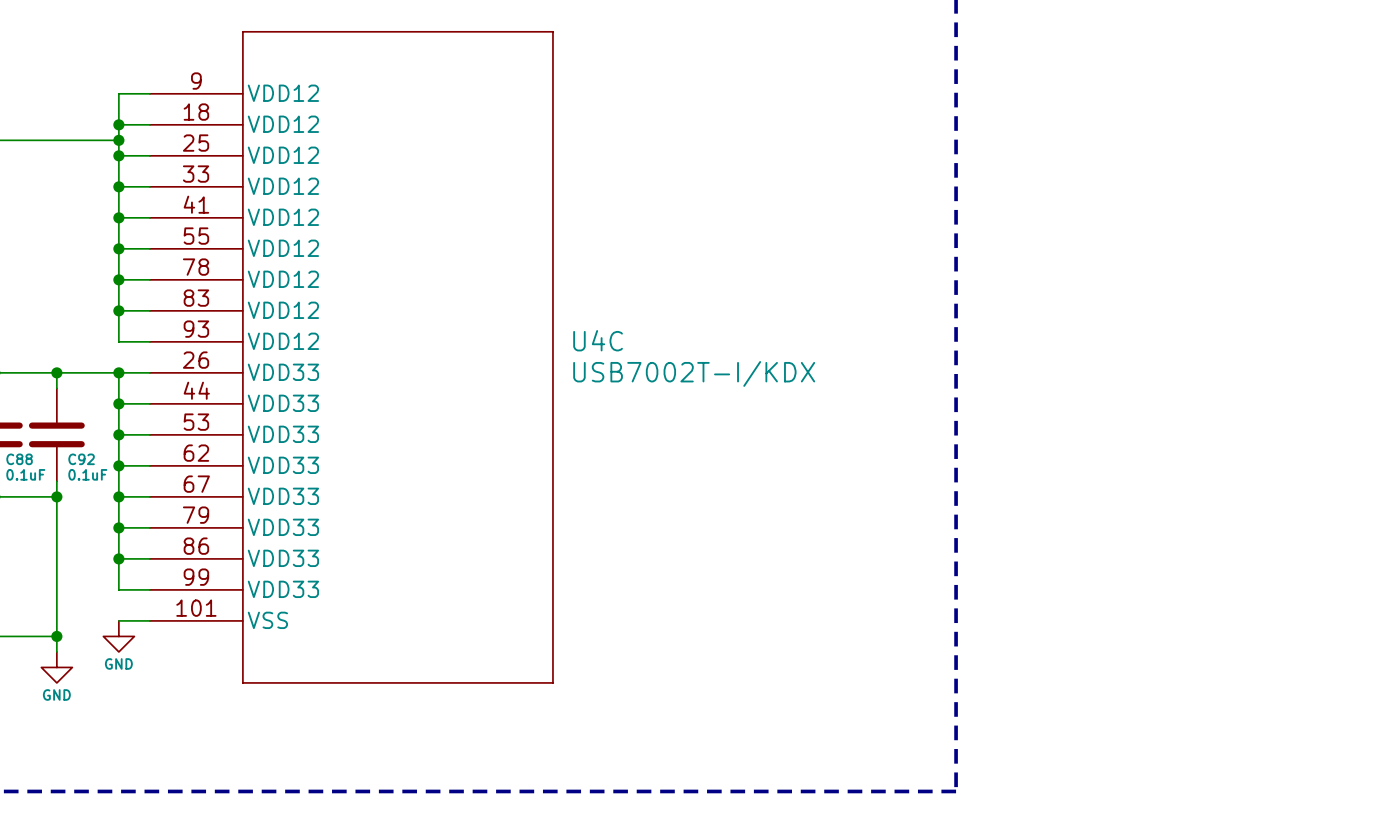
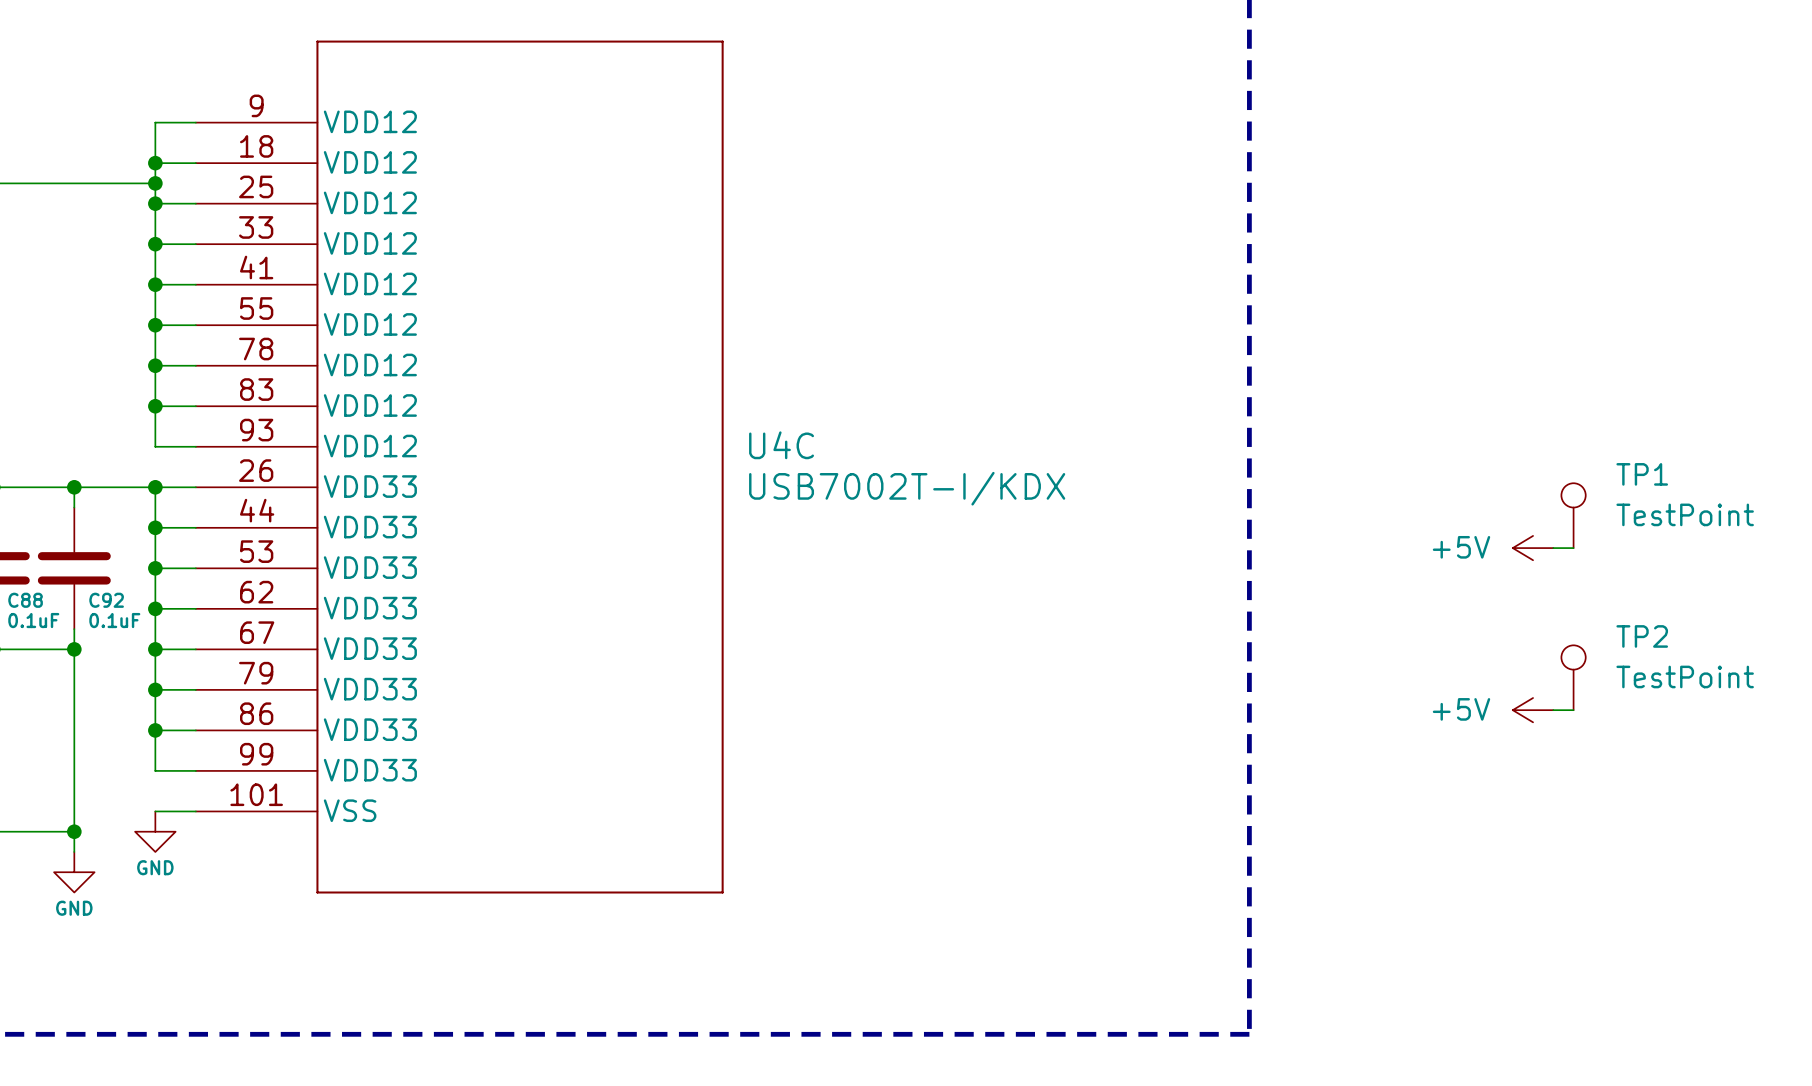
TP1: none -> TestPoint (1573, 515)
power symbol: none -> +5V (1533, 548)
wire: none -> (1553, 548) (1573, 548)
TP2: none -> TestPoint (1573, 677)
power symbol: none -> +5V (1533, 710)
wire: none -> (1553, 710) (1573, 710)

